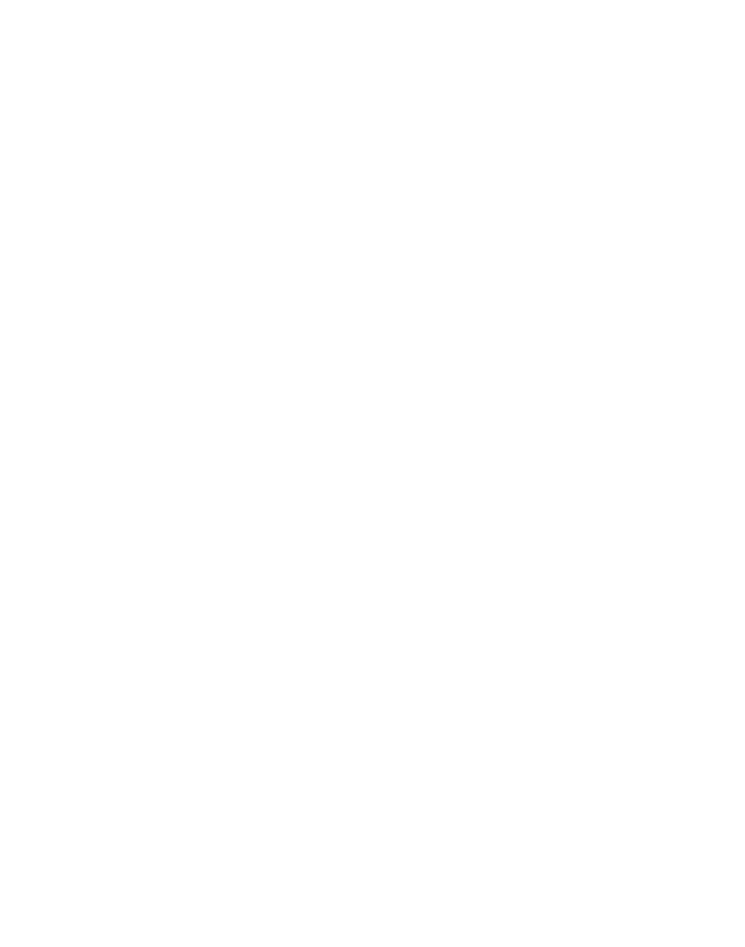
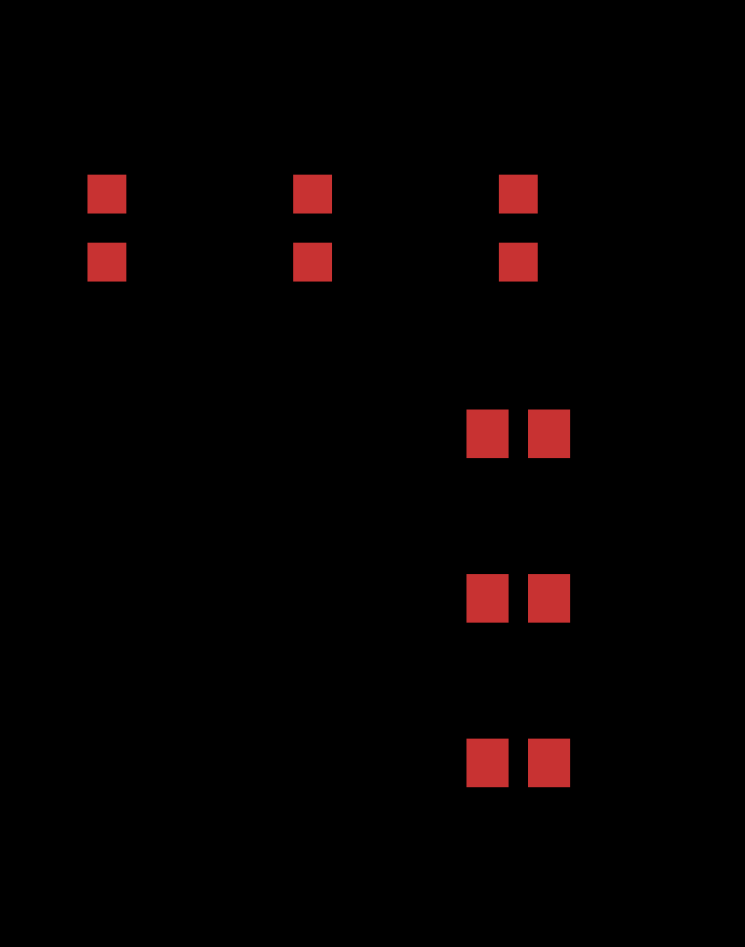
part: none -> (106, 228)
part: none -> (312, 228)
part: none -> (518, 228)
part: none -> (518, 433)
part: none -> (518, 598)
part: none -> (518, 762)

